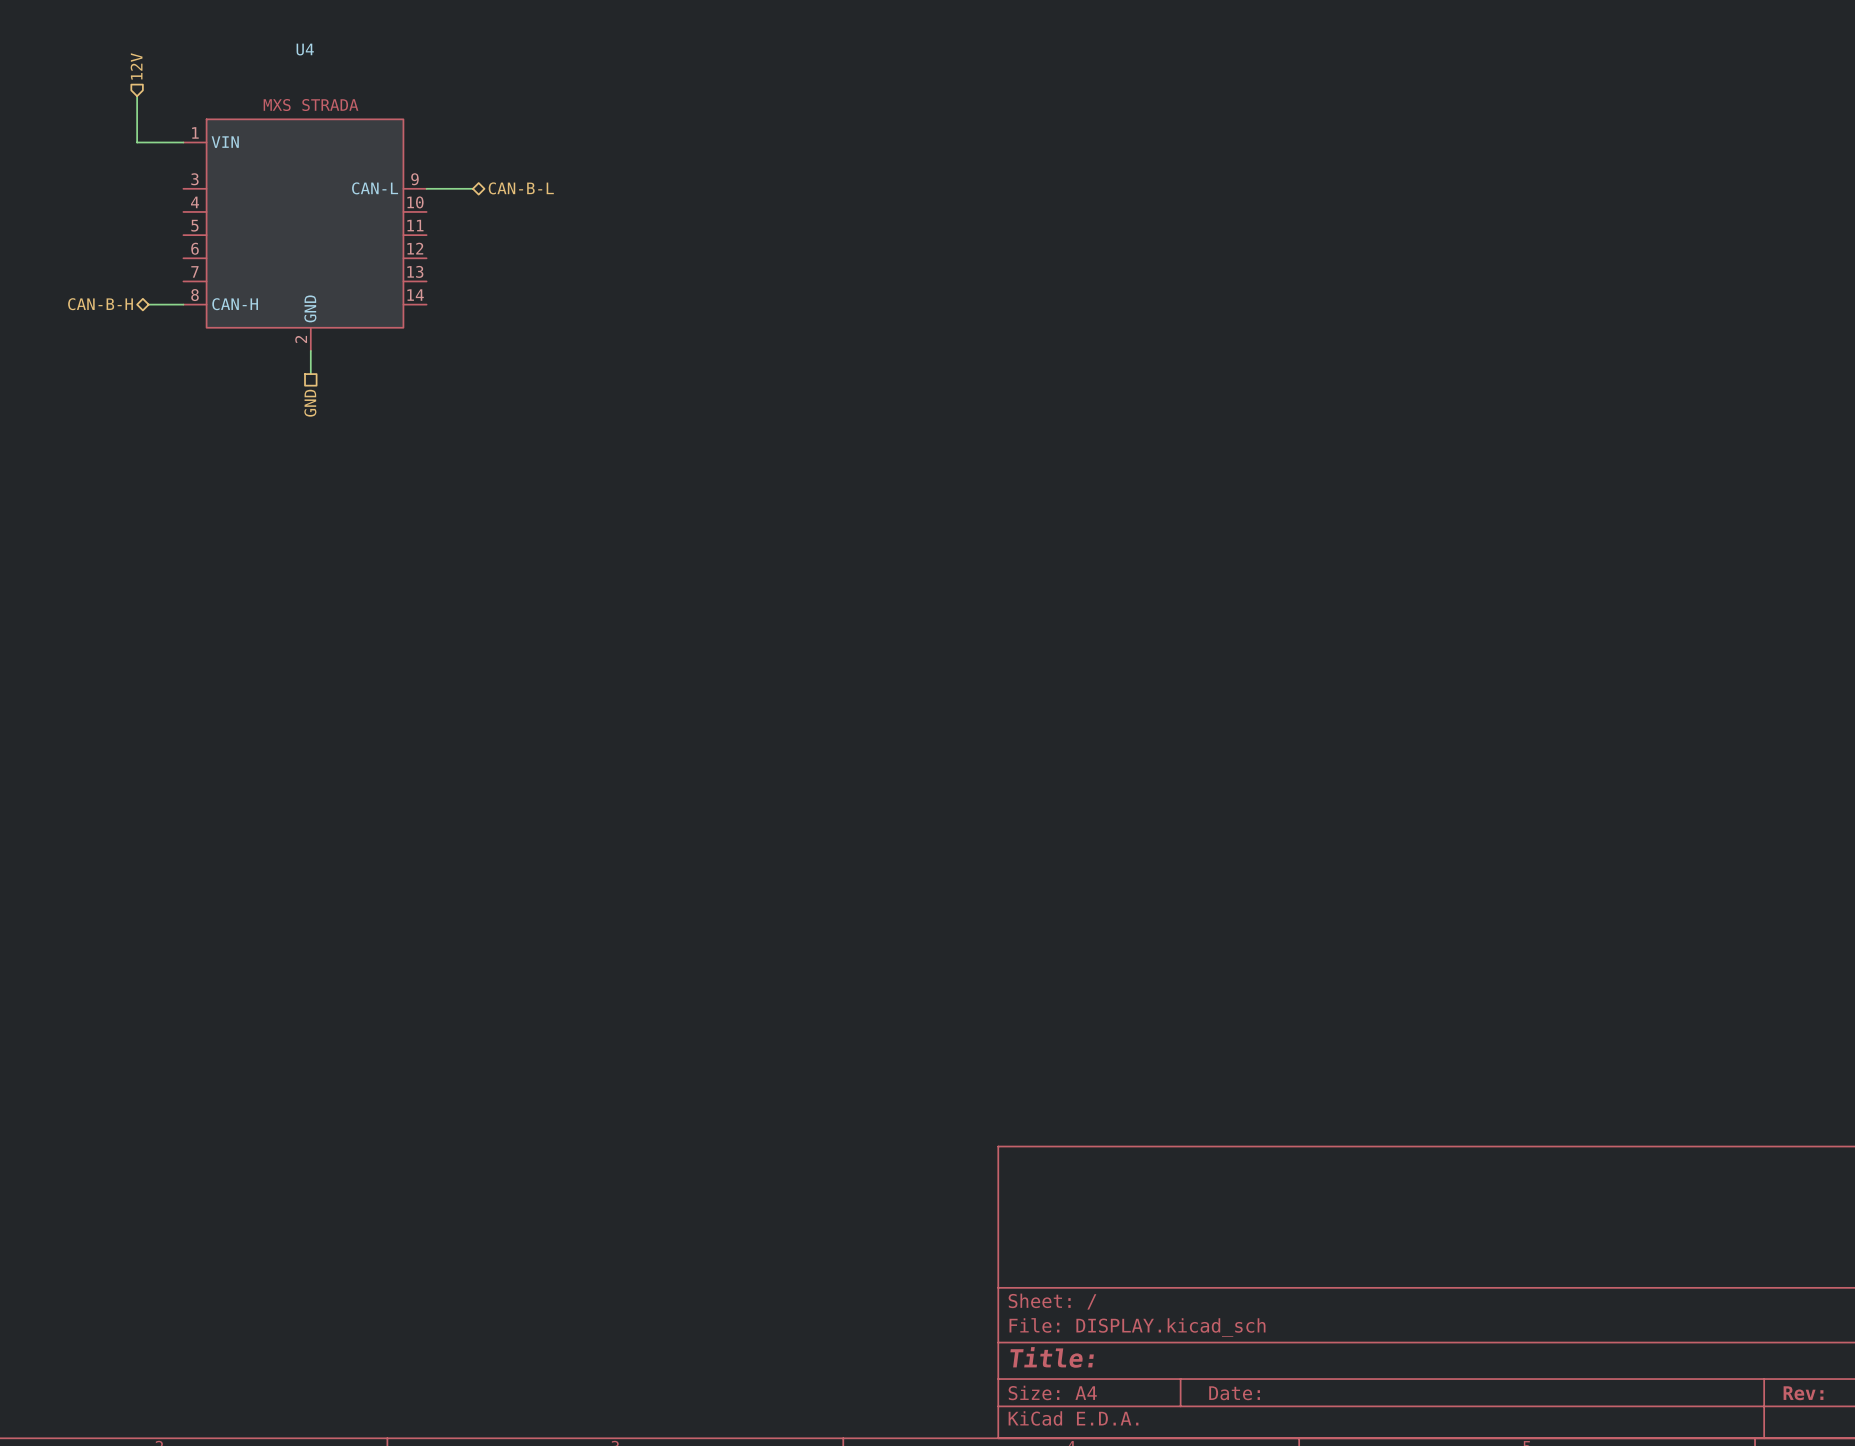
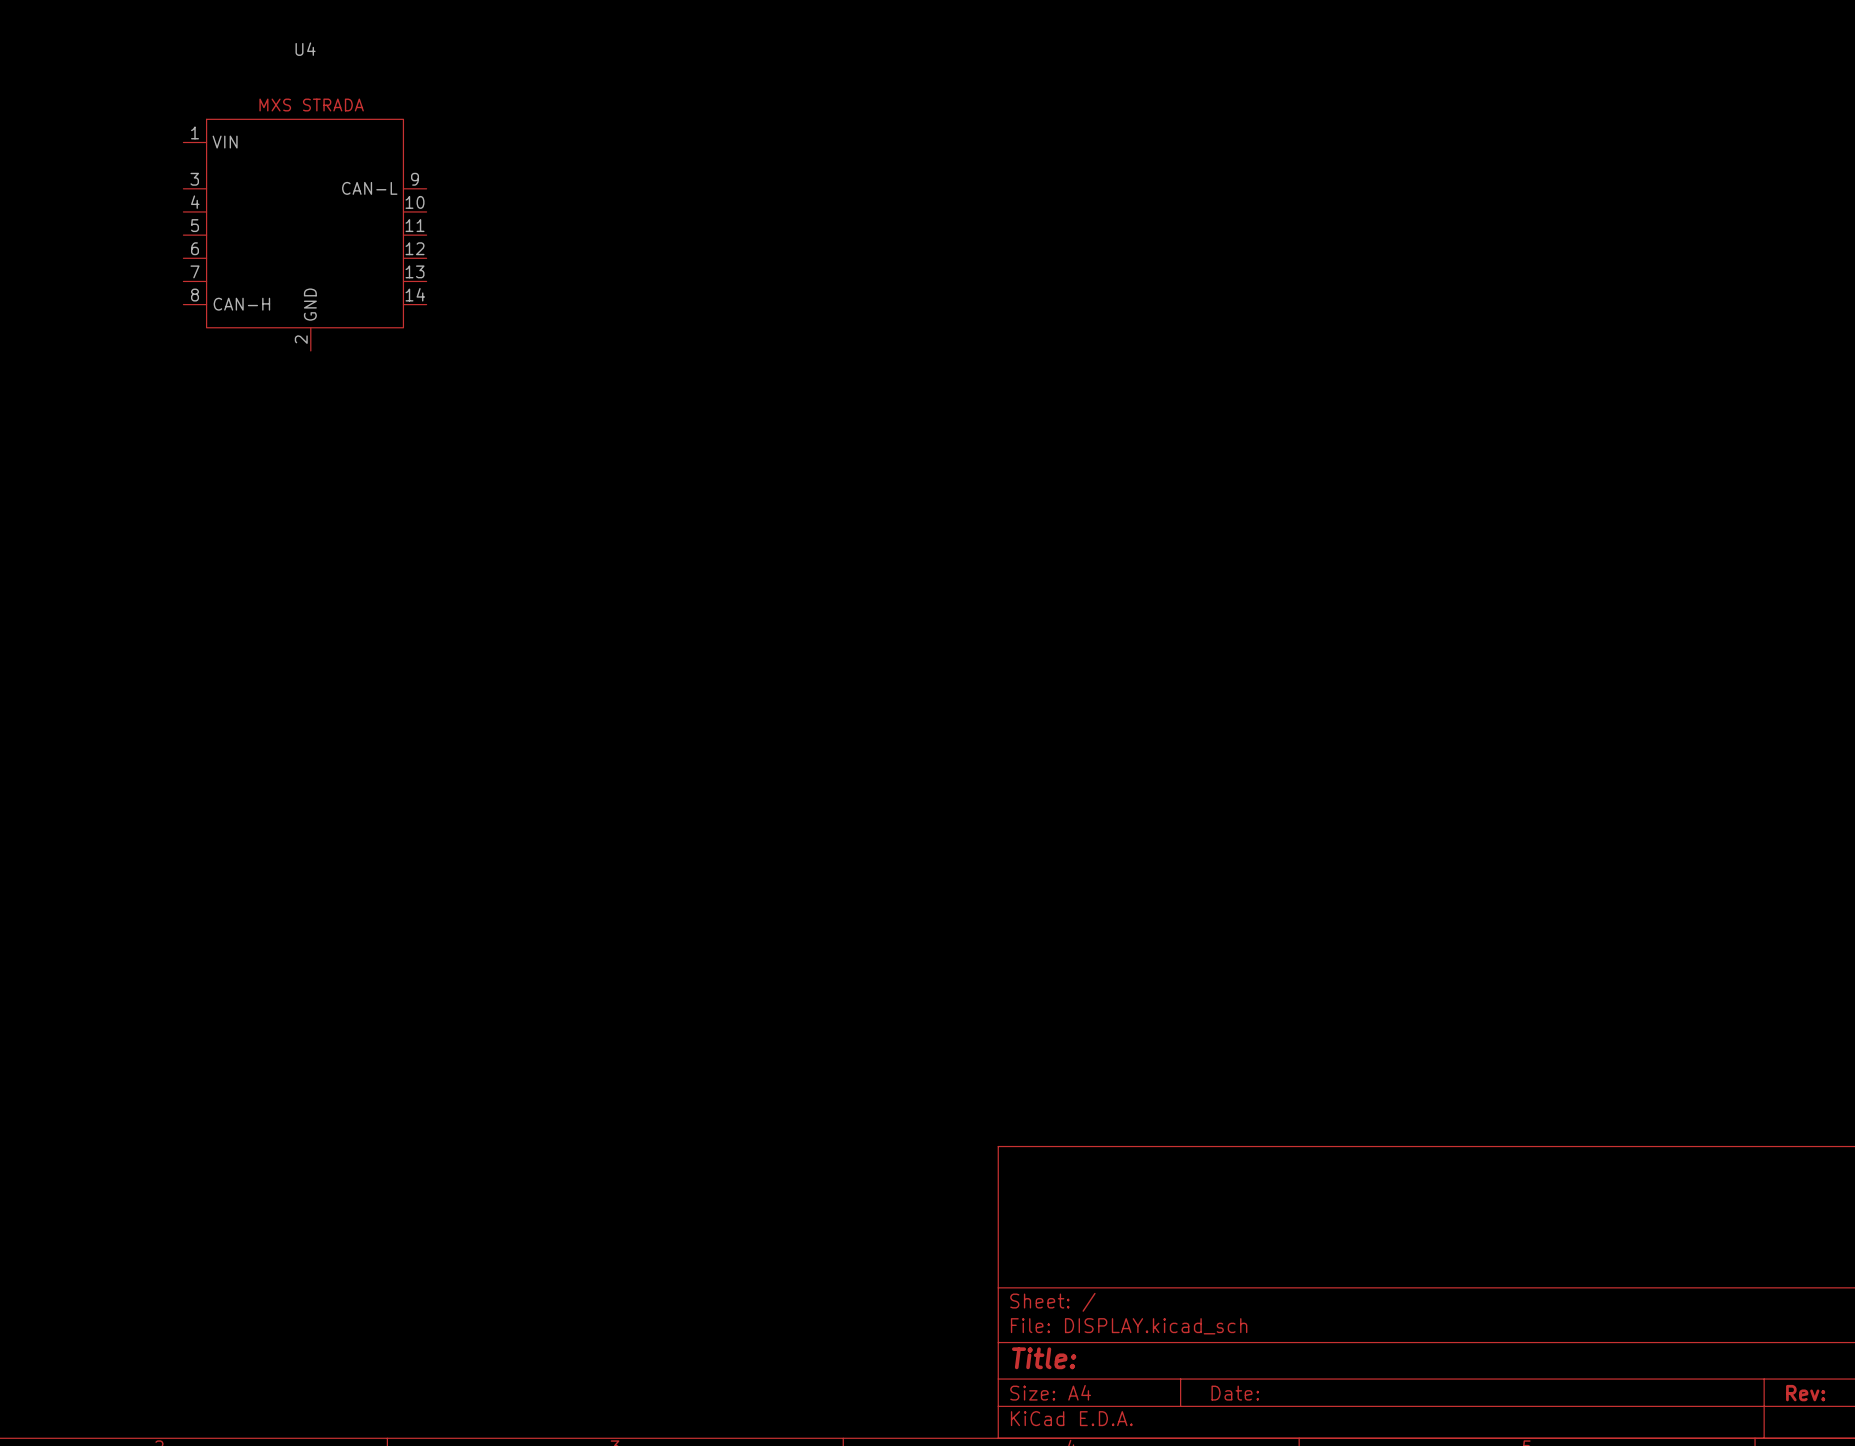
hierarchical label: 12V (136, 66) -> none
wire: (137, 96) (137, 142) (183, 142) -> none
wire: (426, 188) (472, 188) -> none
hierarchical label: CAN-B-L (521, 188) -> none
hierarchical label: CAN-B-H (100, 304) -> none
wire: (148, 304) (183, 304) -> none
wire: (310, 350) (310, 374) -> none
hierarchical label: GND (310, 403) -> none

